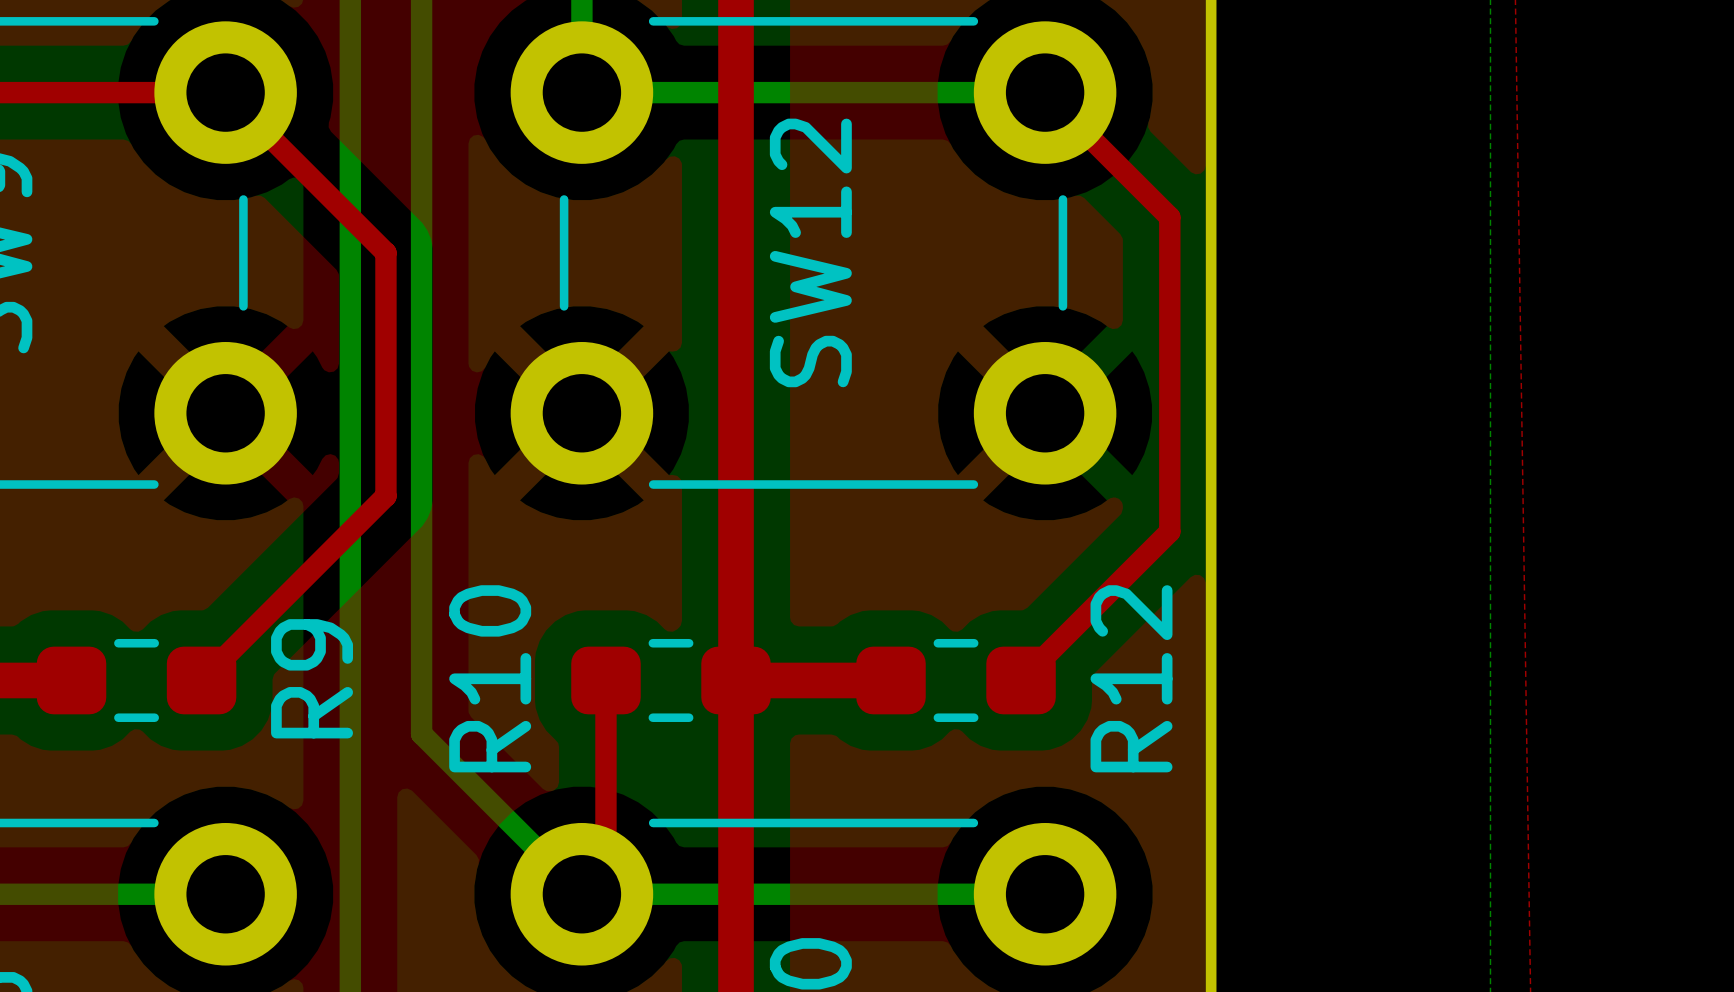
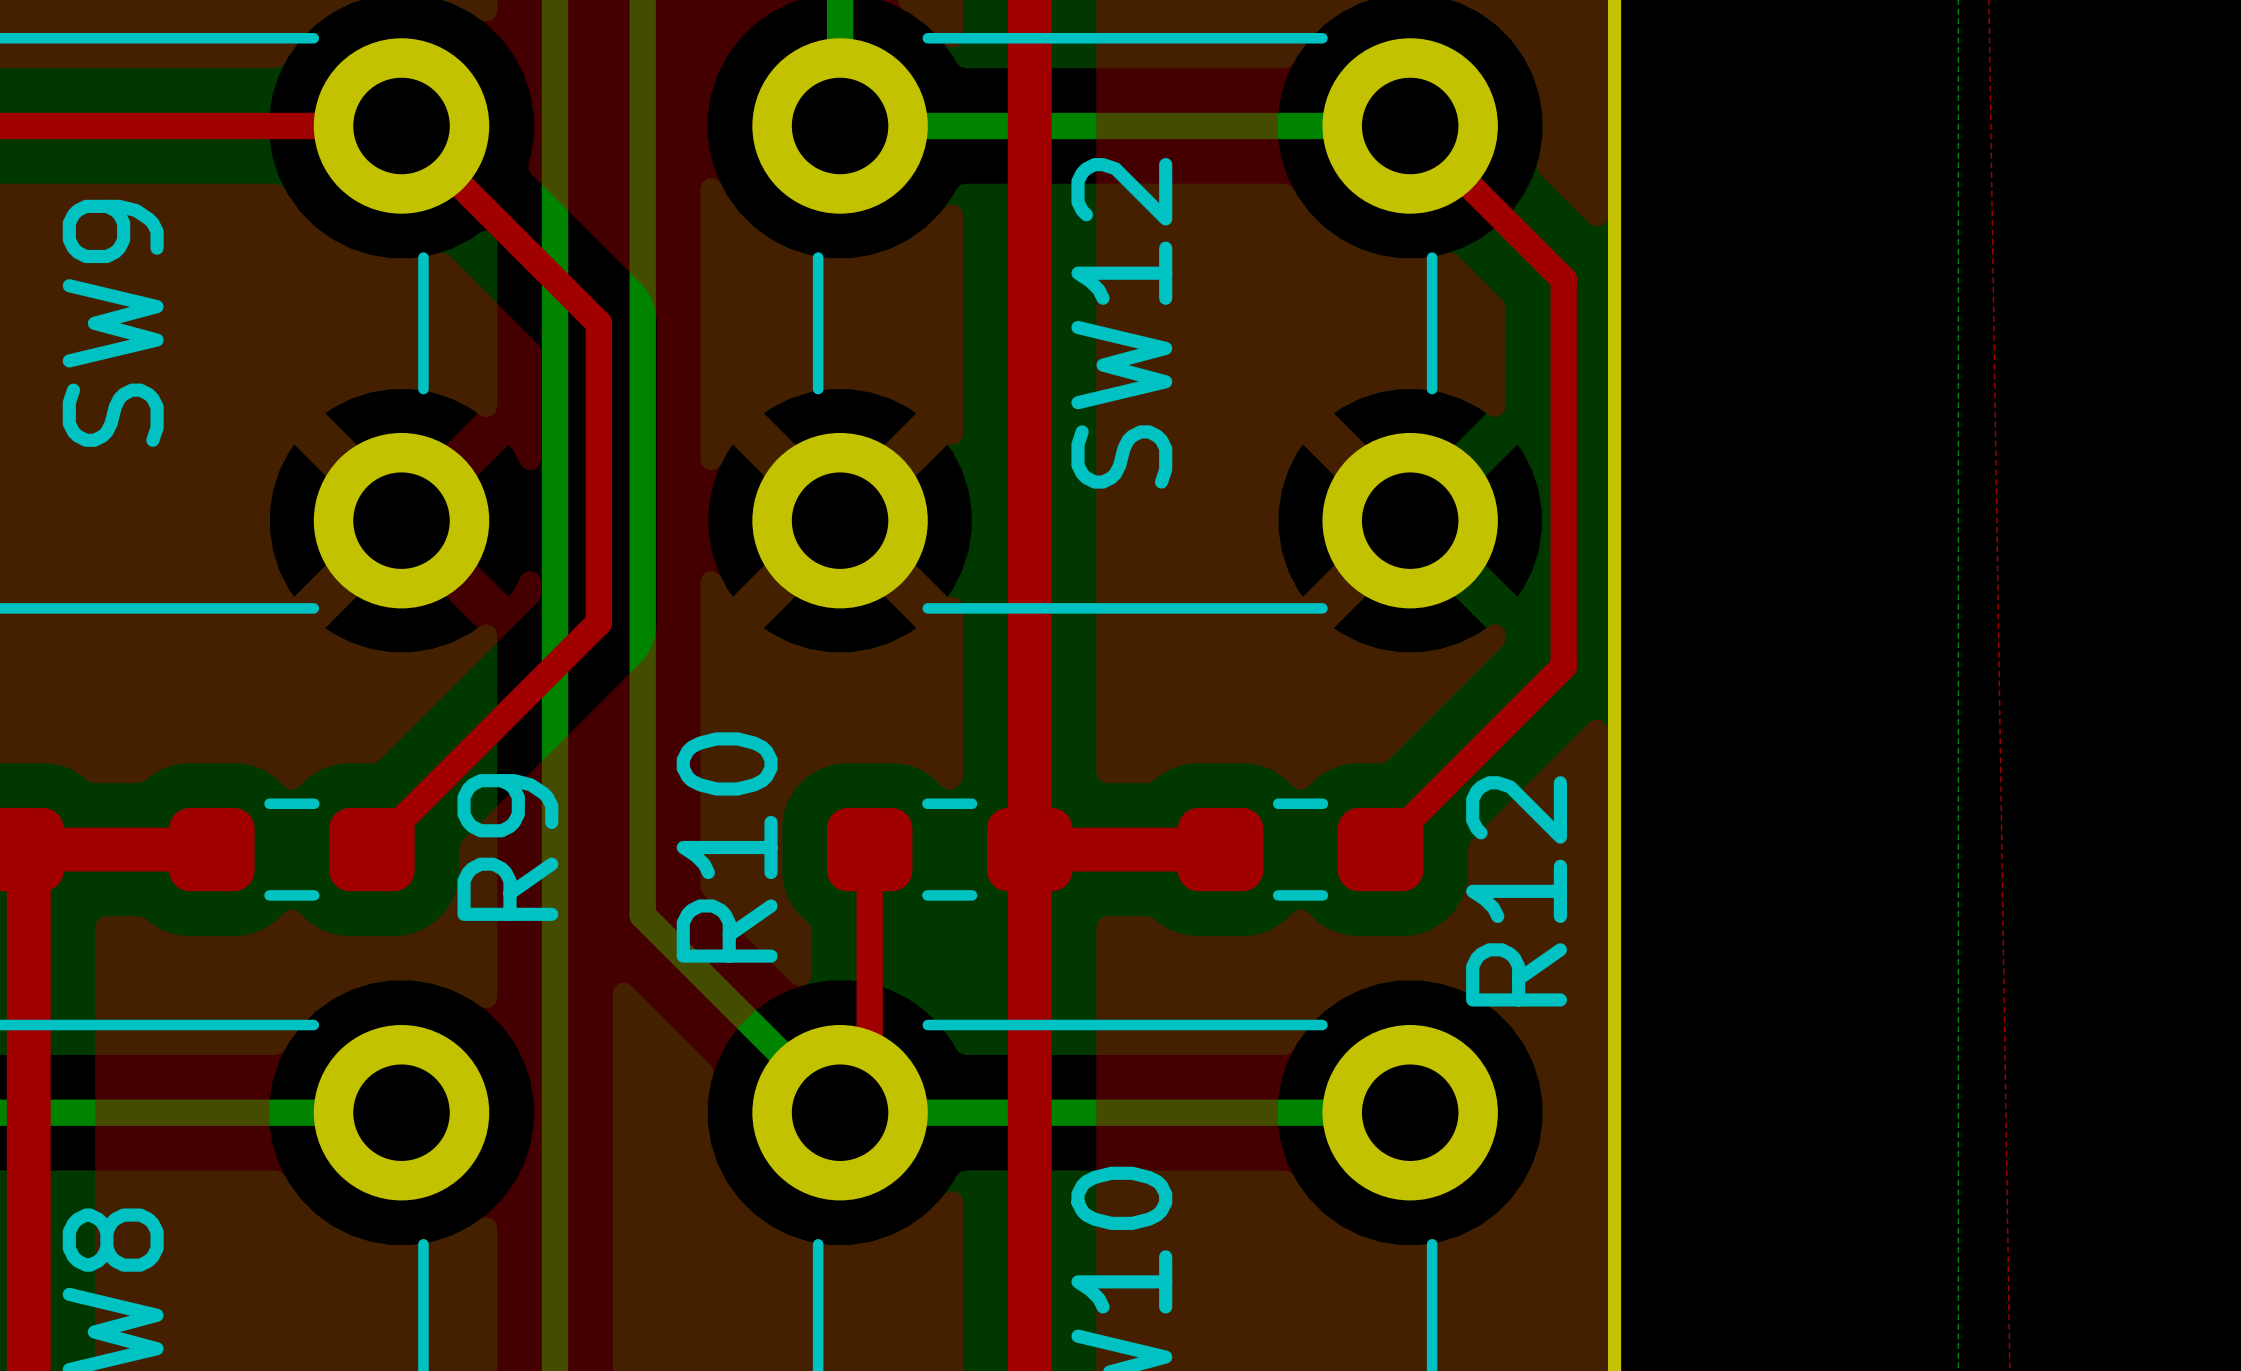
R12 name position: R12 (1131, 678) -> R12 (1516, 891)

